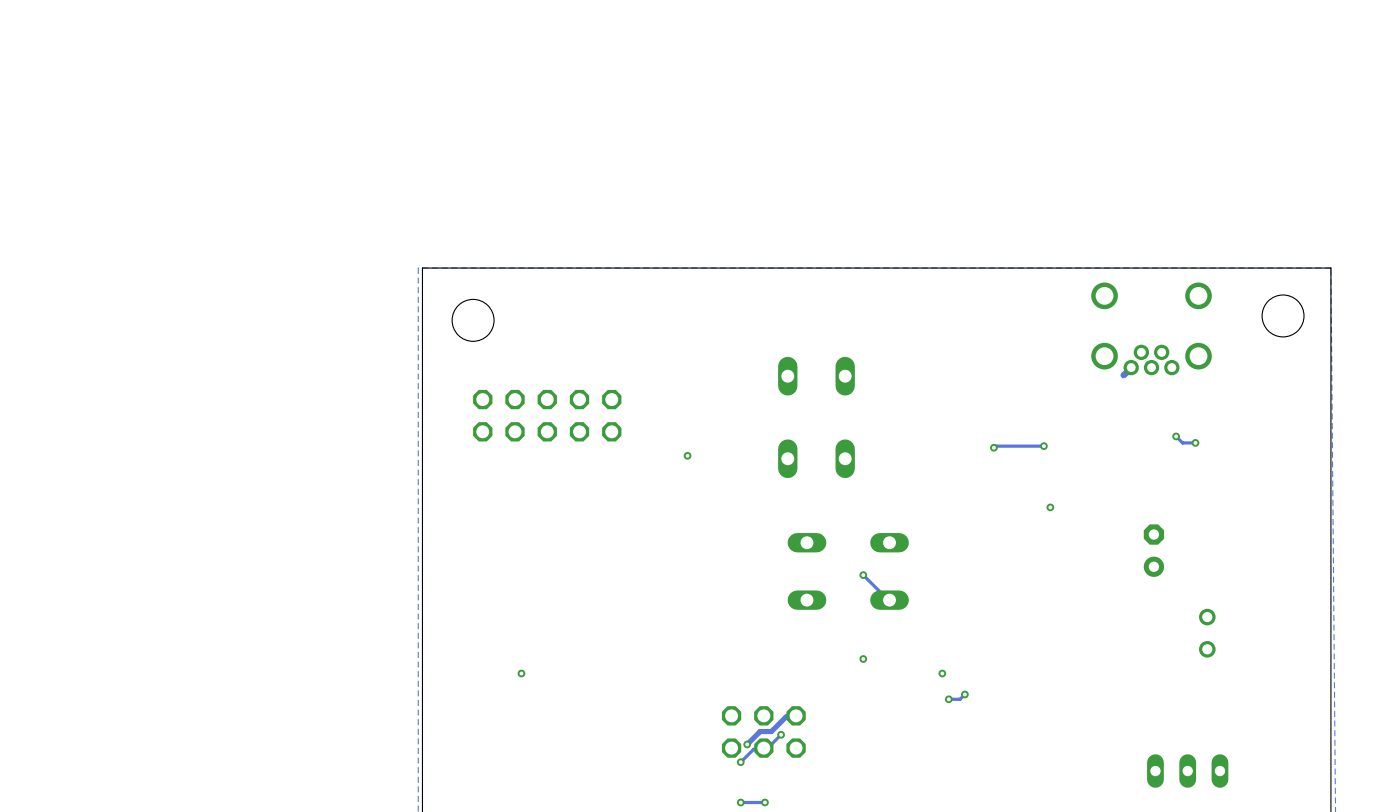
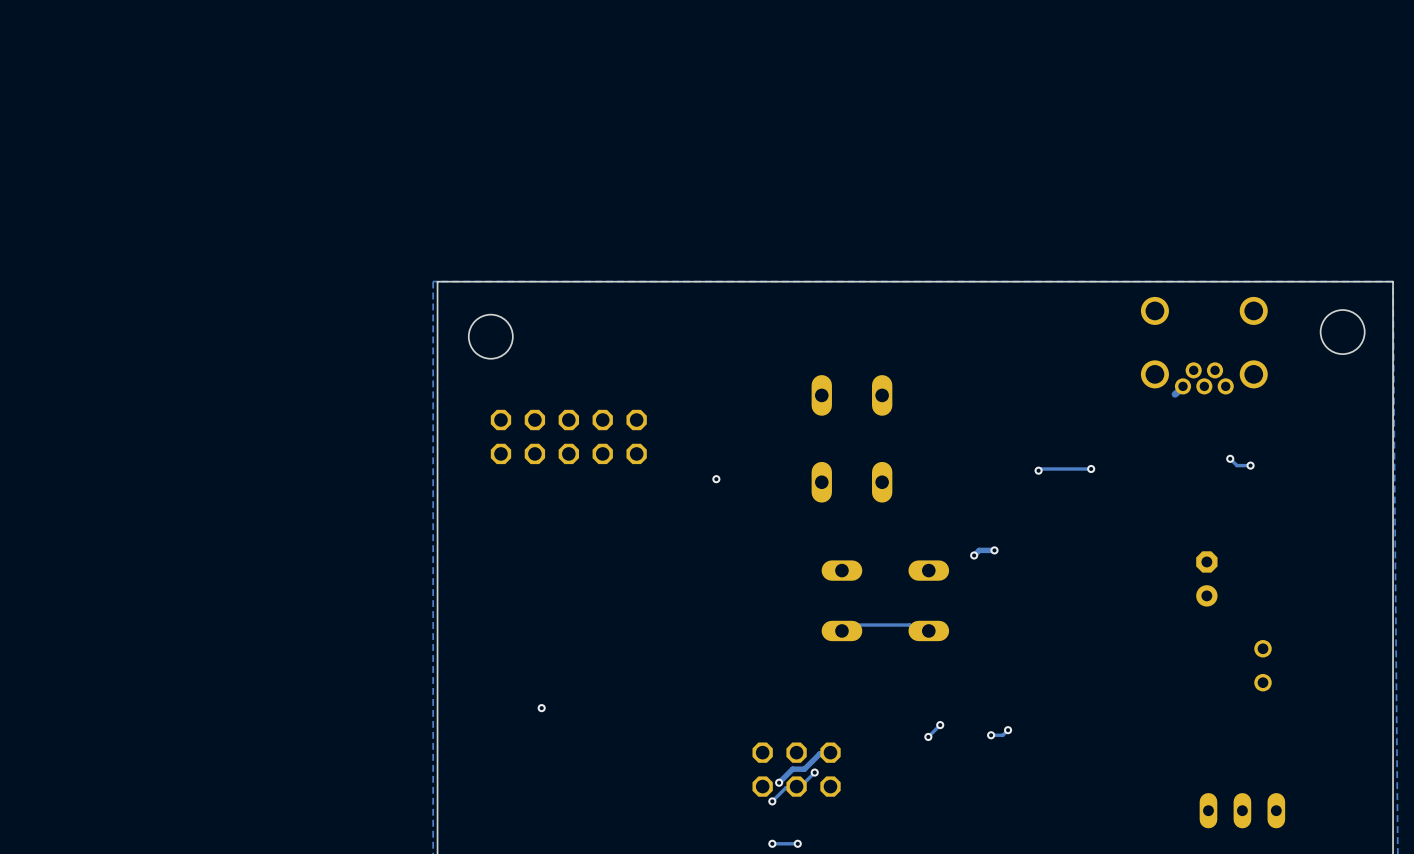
via: (1050, 507) -> none
track: none -> (994, 550) (979, 550) (974, 555)
via: none -> (994, 550)
via: none -> (974, 555)
track: (863, 575) (887, 599) -> (841, 630) (848, 625) (909, 625) (914, 630) (926, 630)
via: (863, 575) -> none
via: (863, 658) -> none
via: (942, 673) -> none
track: none -> (940, 725) (928, 736)
via: none -> (940, 725)
via: none -> (928, 736)

